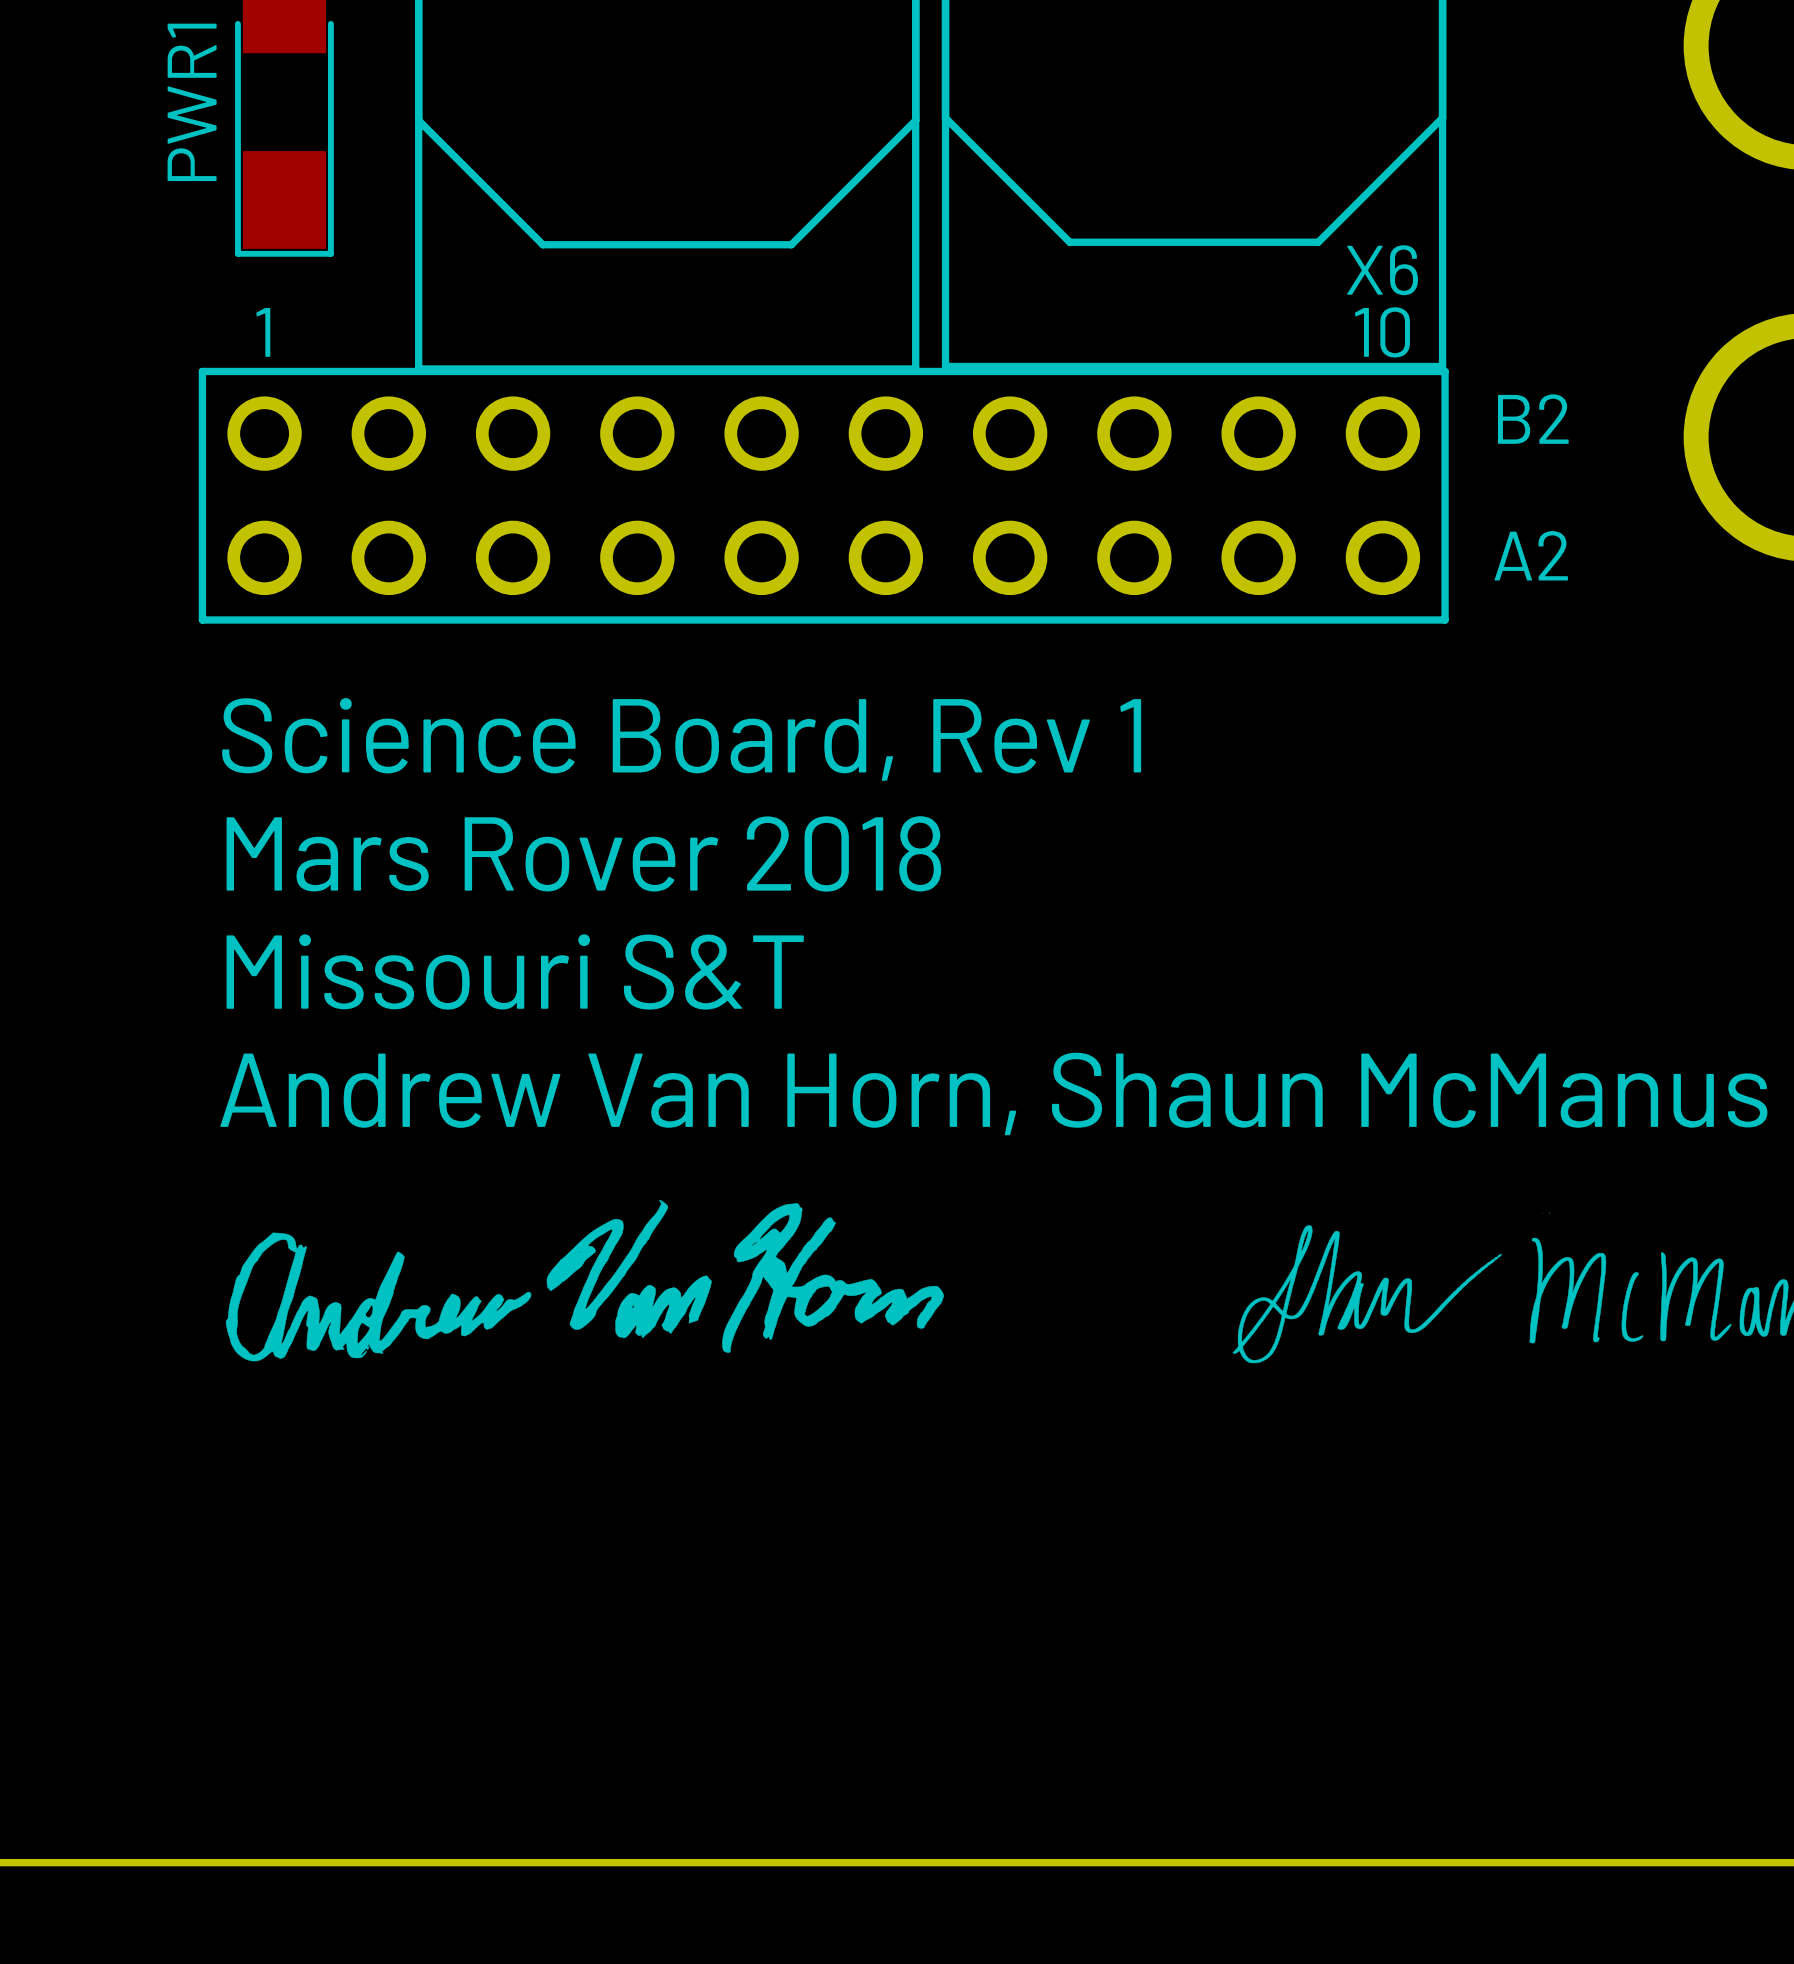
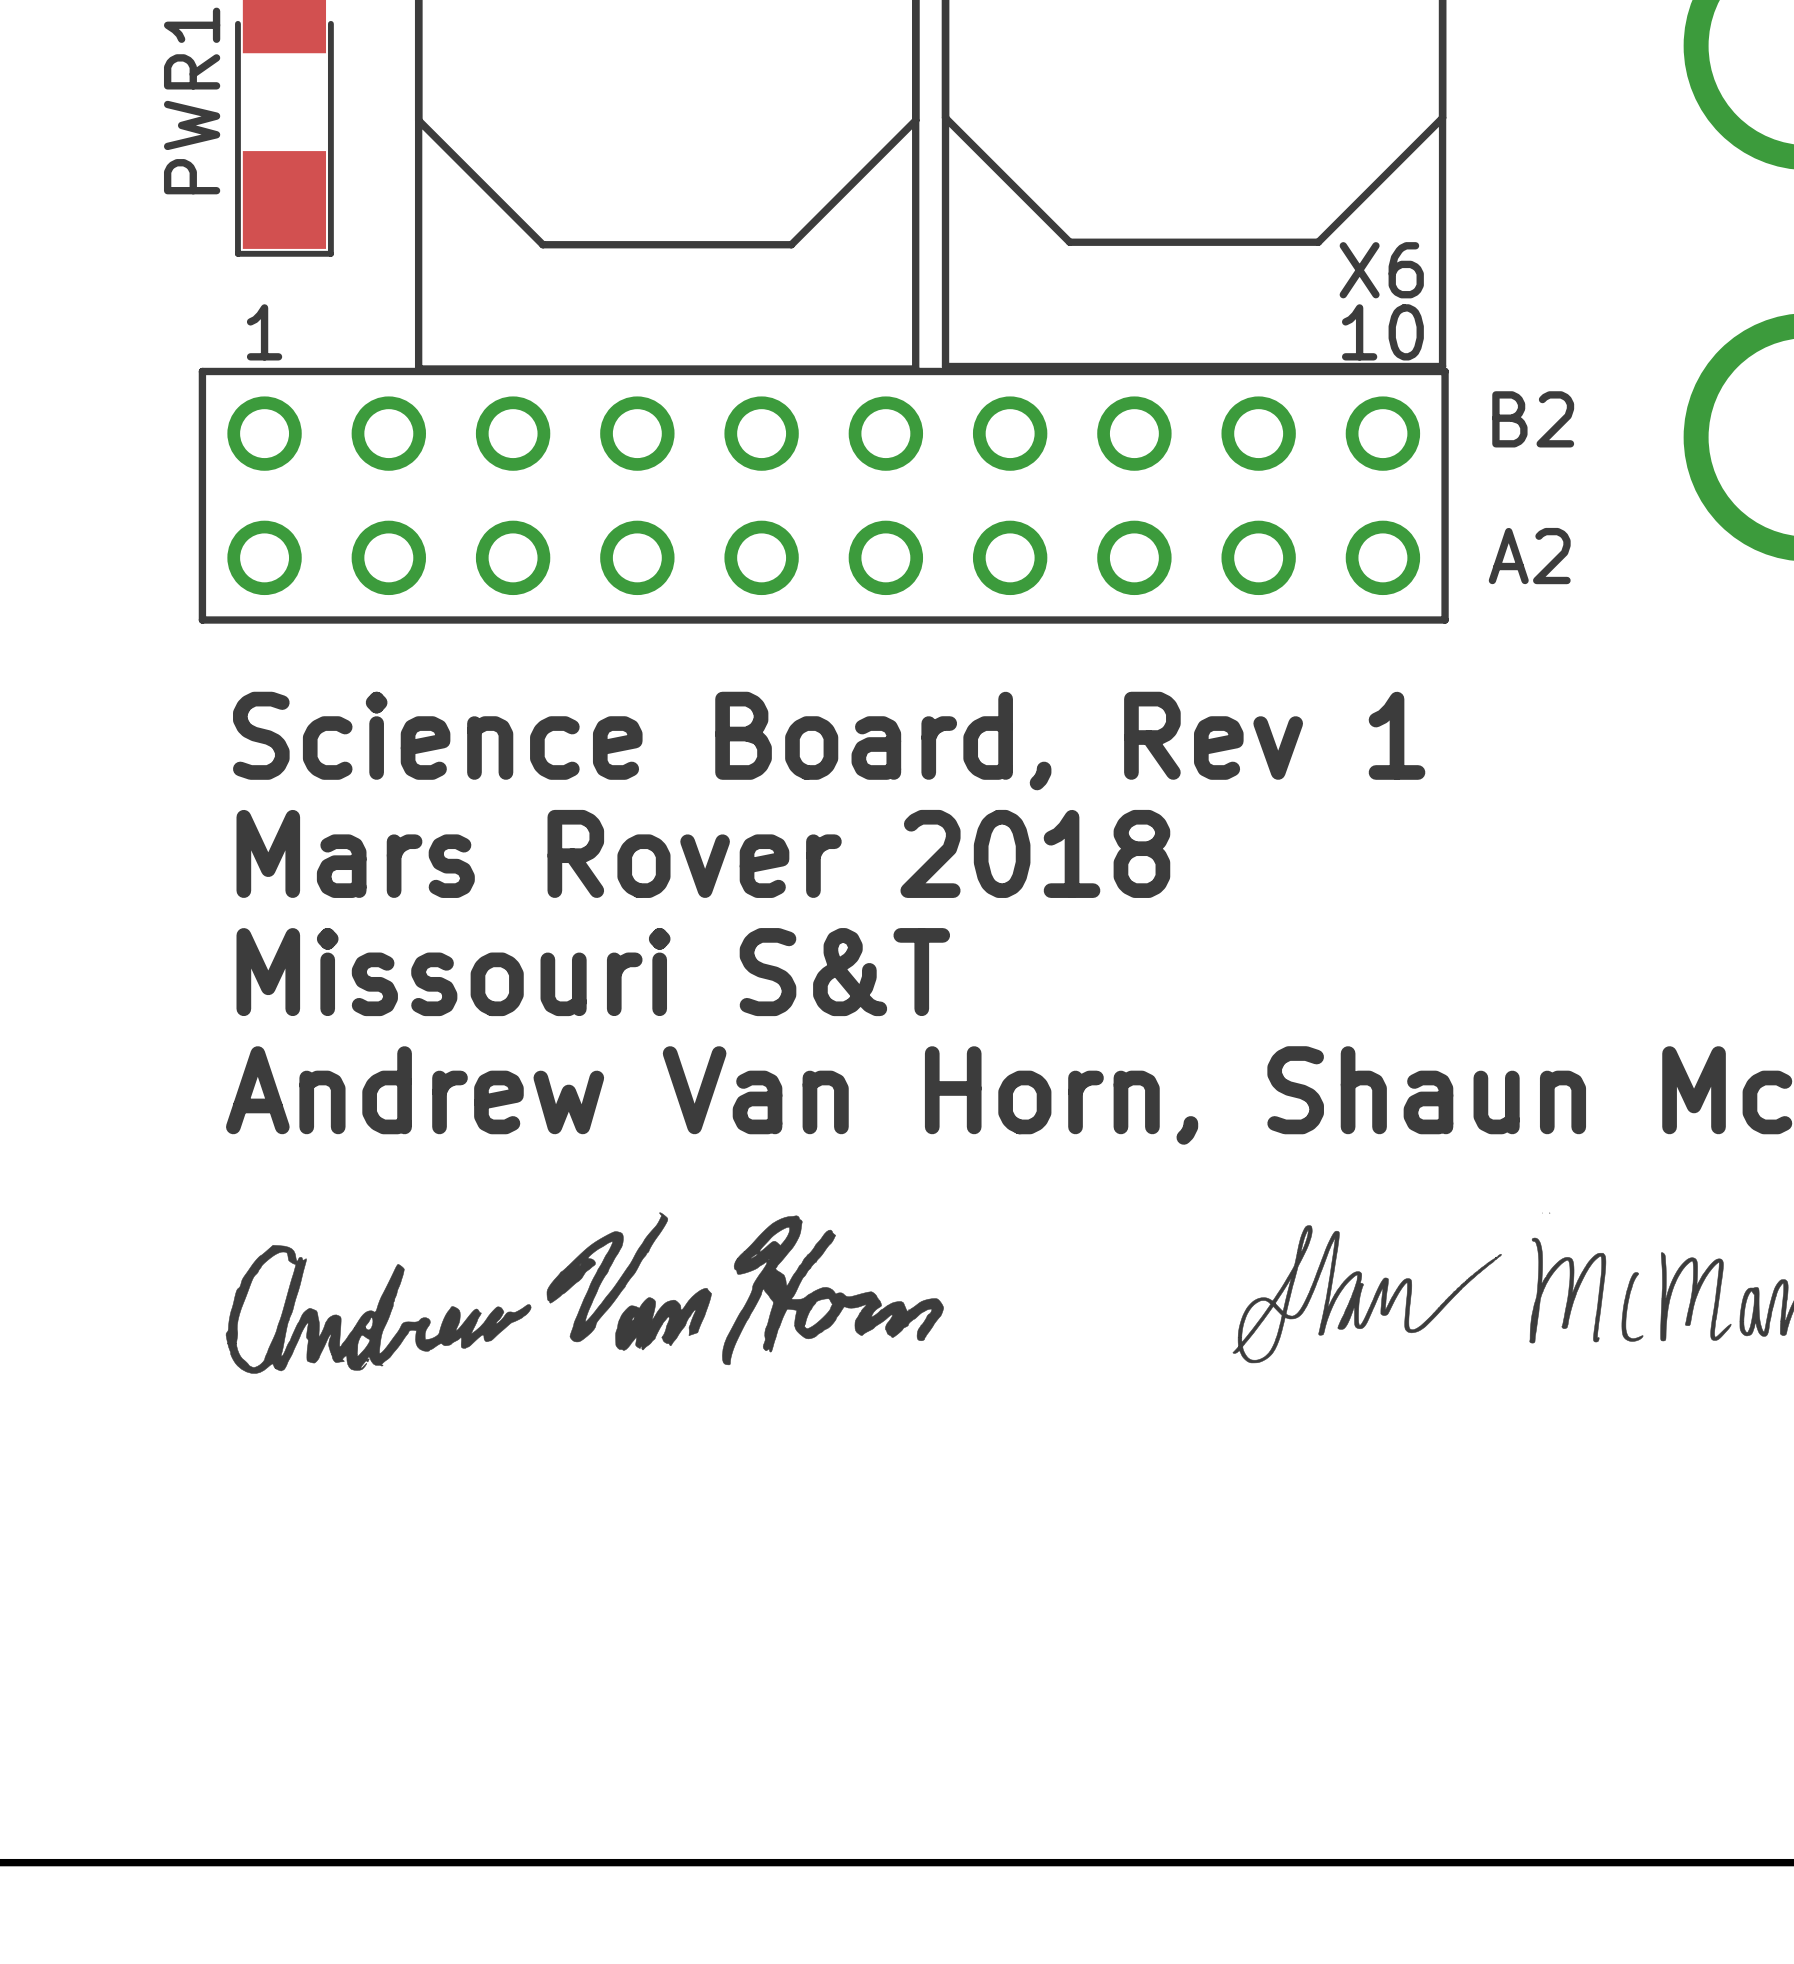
drawing position: (584, 1280) -> (584, 1293)

